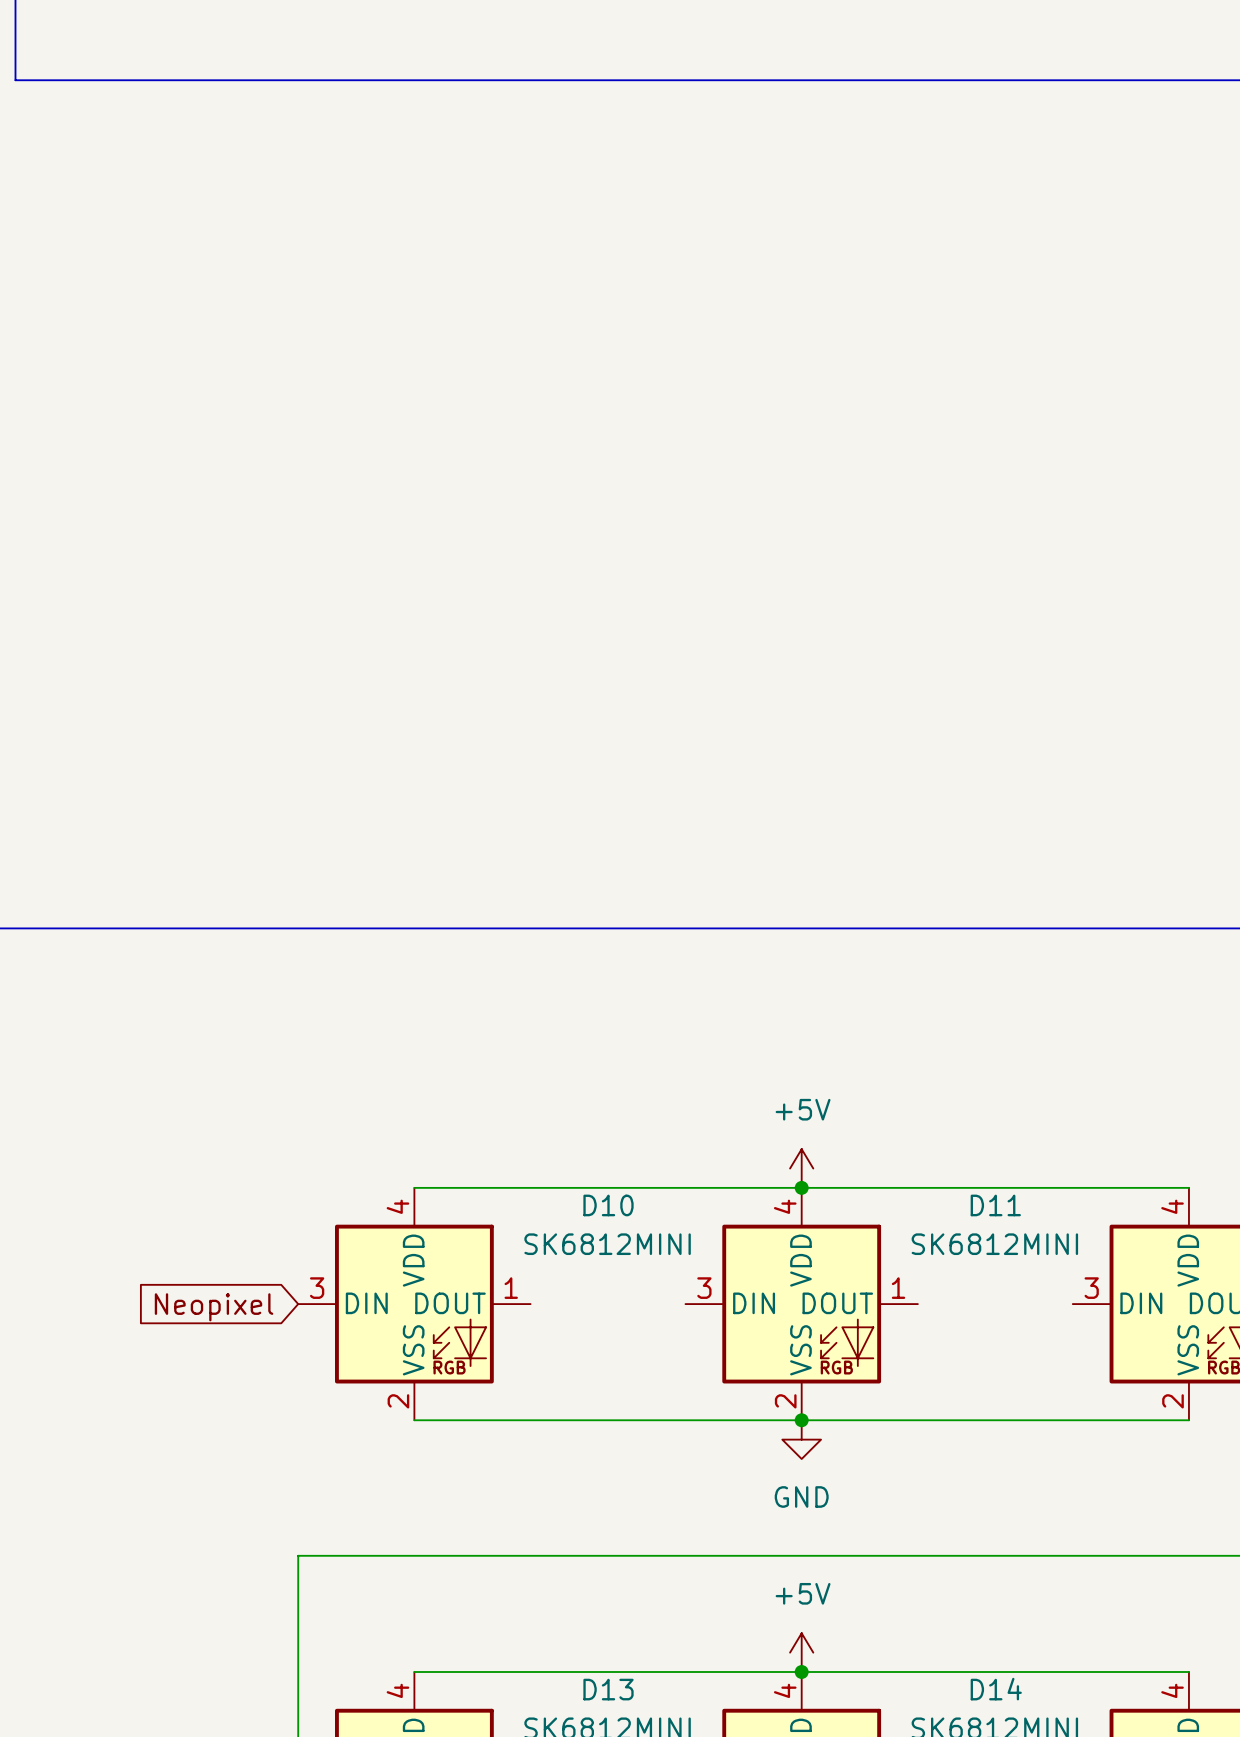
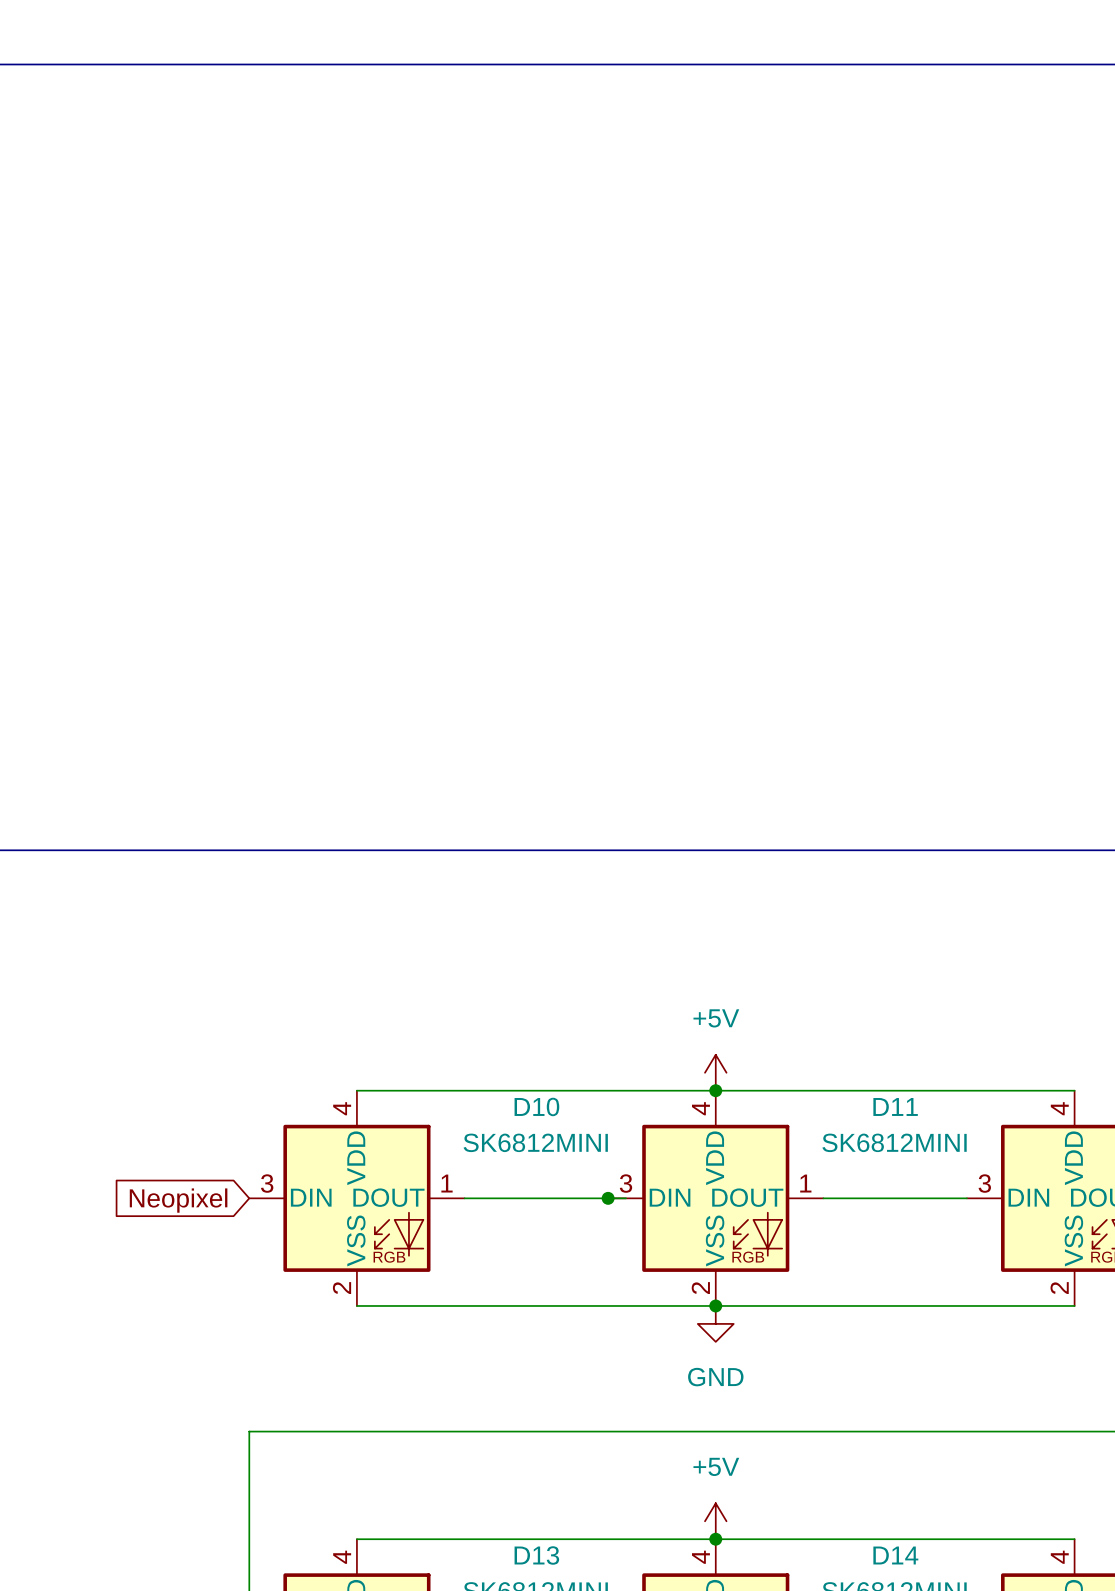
wire: none -> (464, 1198) (626, 1198)
junction: none -> (608, 1198)
wire: none -> (823, 1198) (966, 1198)

